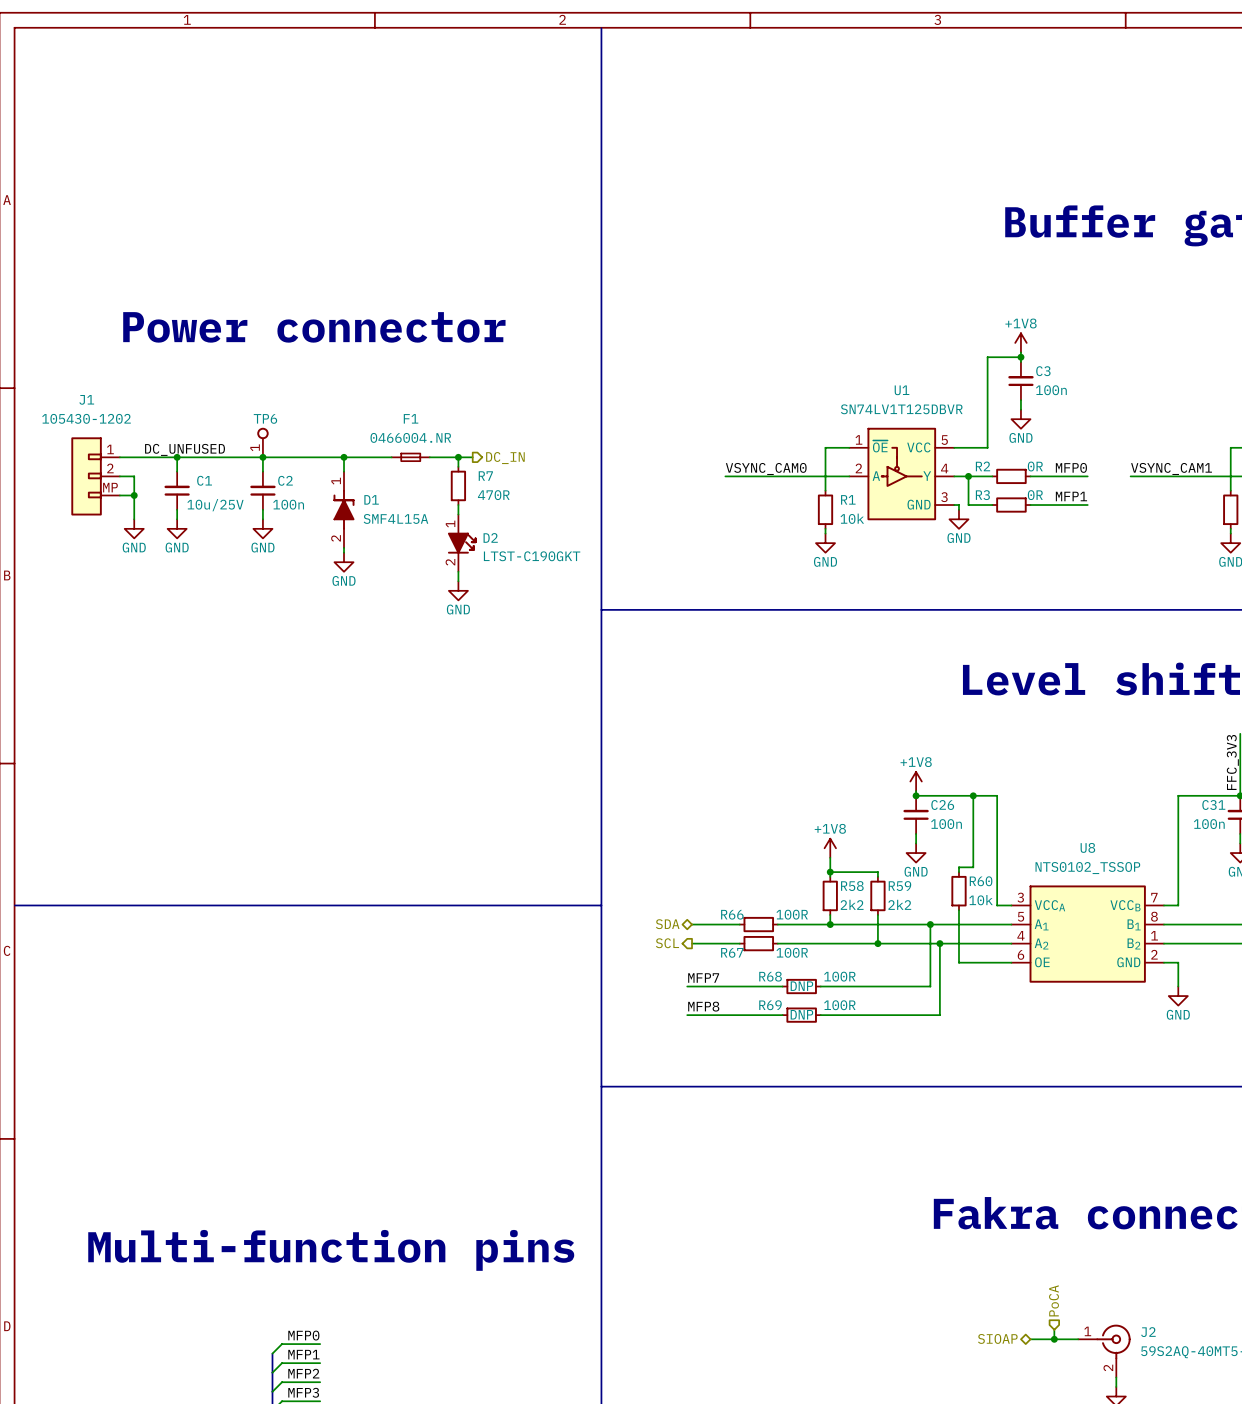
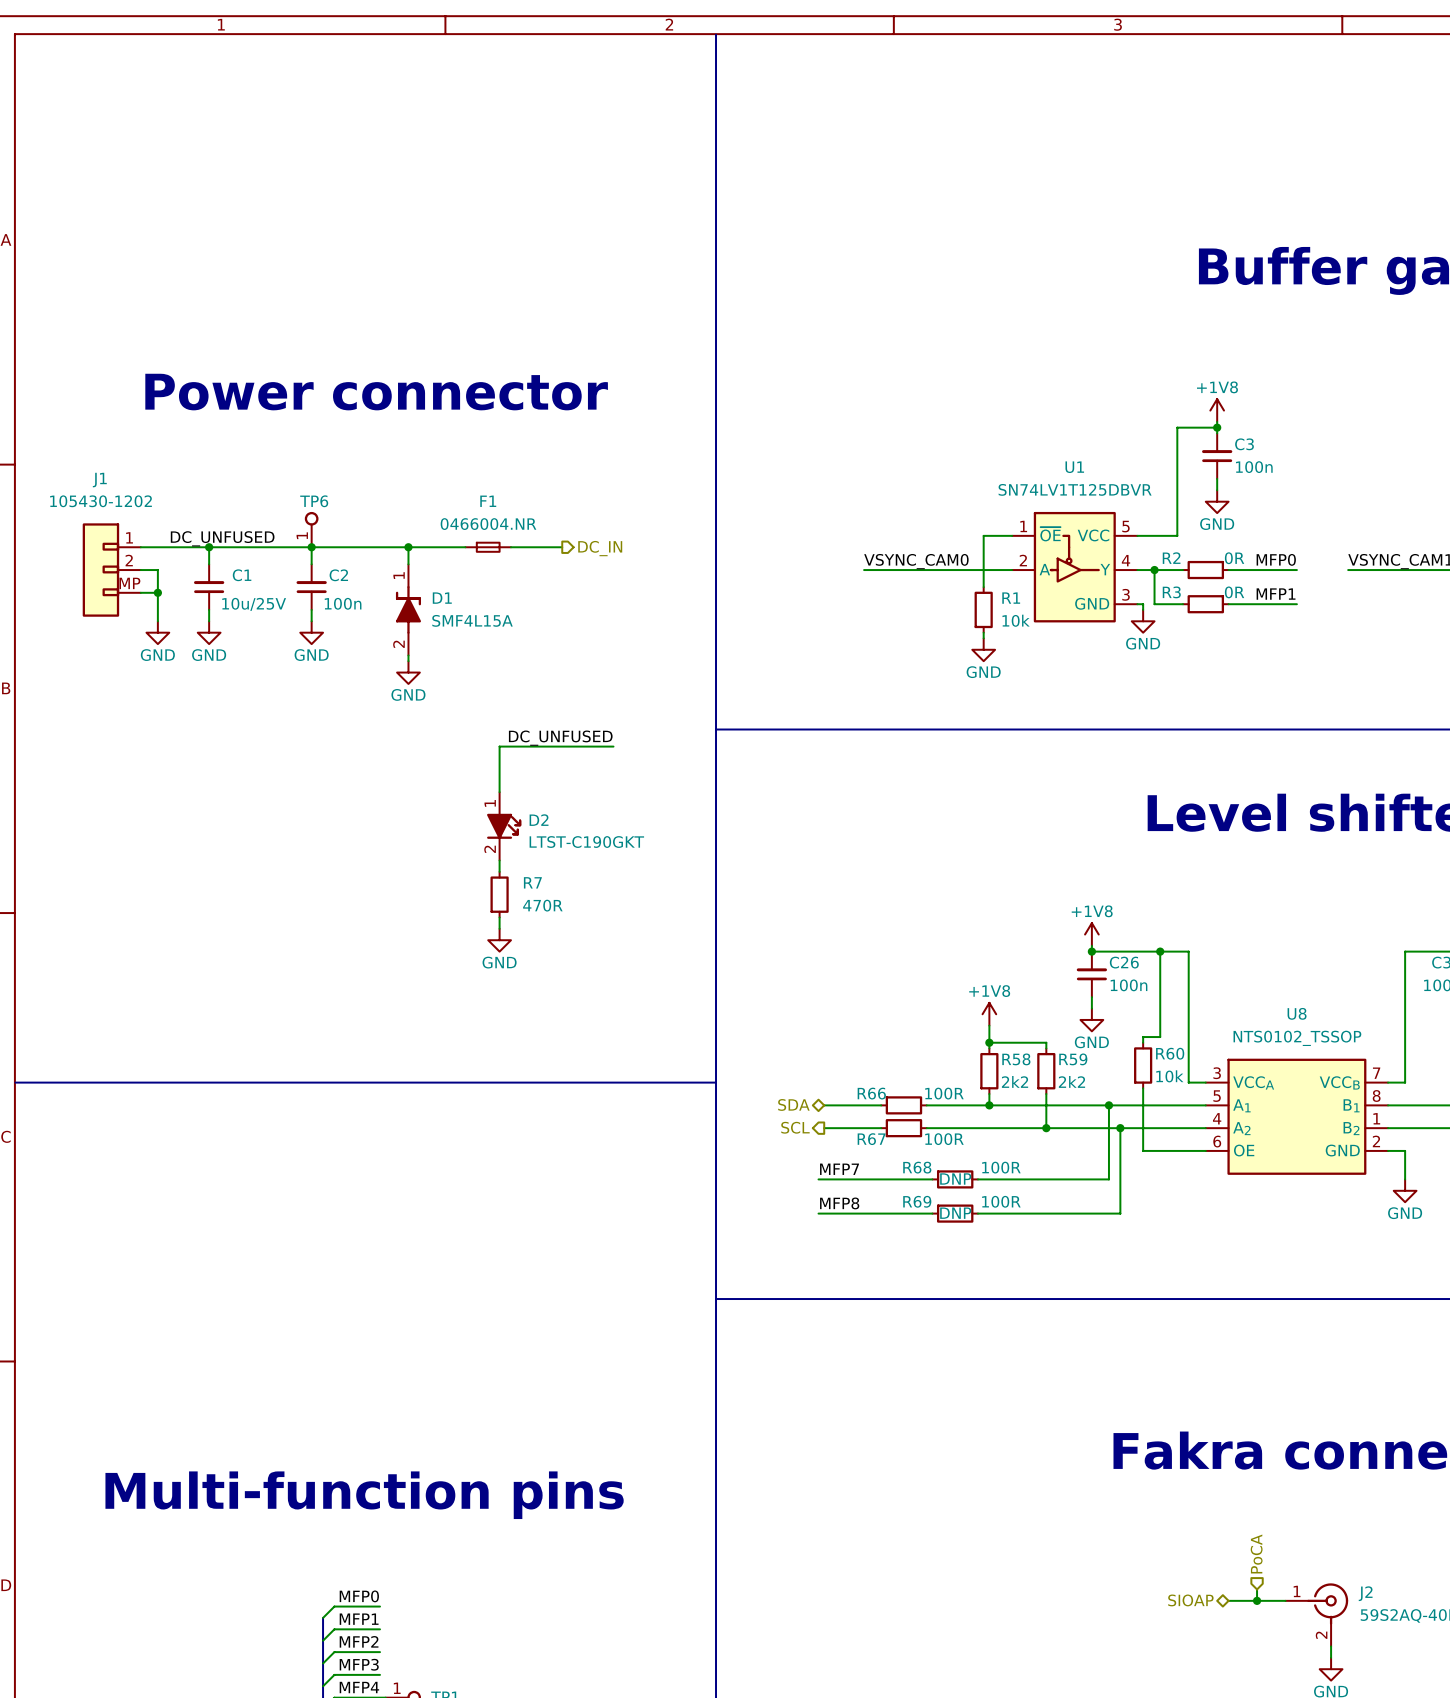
wire: (458, 457) (458, 466) -> none
junction: (458, 457) -> none
R7 position: (458, 485) -> (499, 894)
wire: (458, 505) (458, 514) -> none
D2 position: (462, 543) -> (504, 826)
wire: (458, 571) (458, 581) -> (499, 860) (499, 871)
power symbol: GND (458, 590) -> none
label: none -> DC_UNFUSED (560, 738)
wire: none -> (613, 746) (499, 746) (499, 792)
wire: none -> (499, 917) (499, 928)
power symbol: none -> GND (499, 940)

